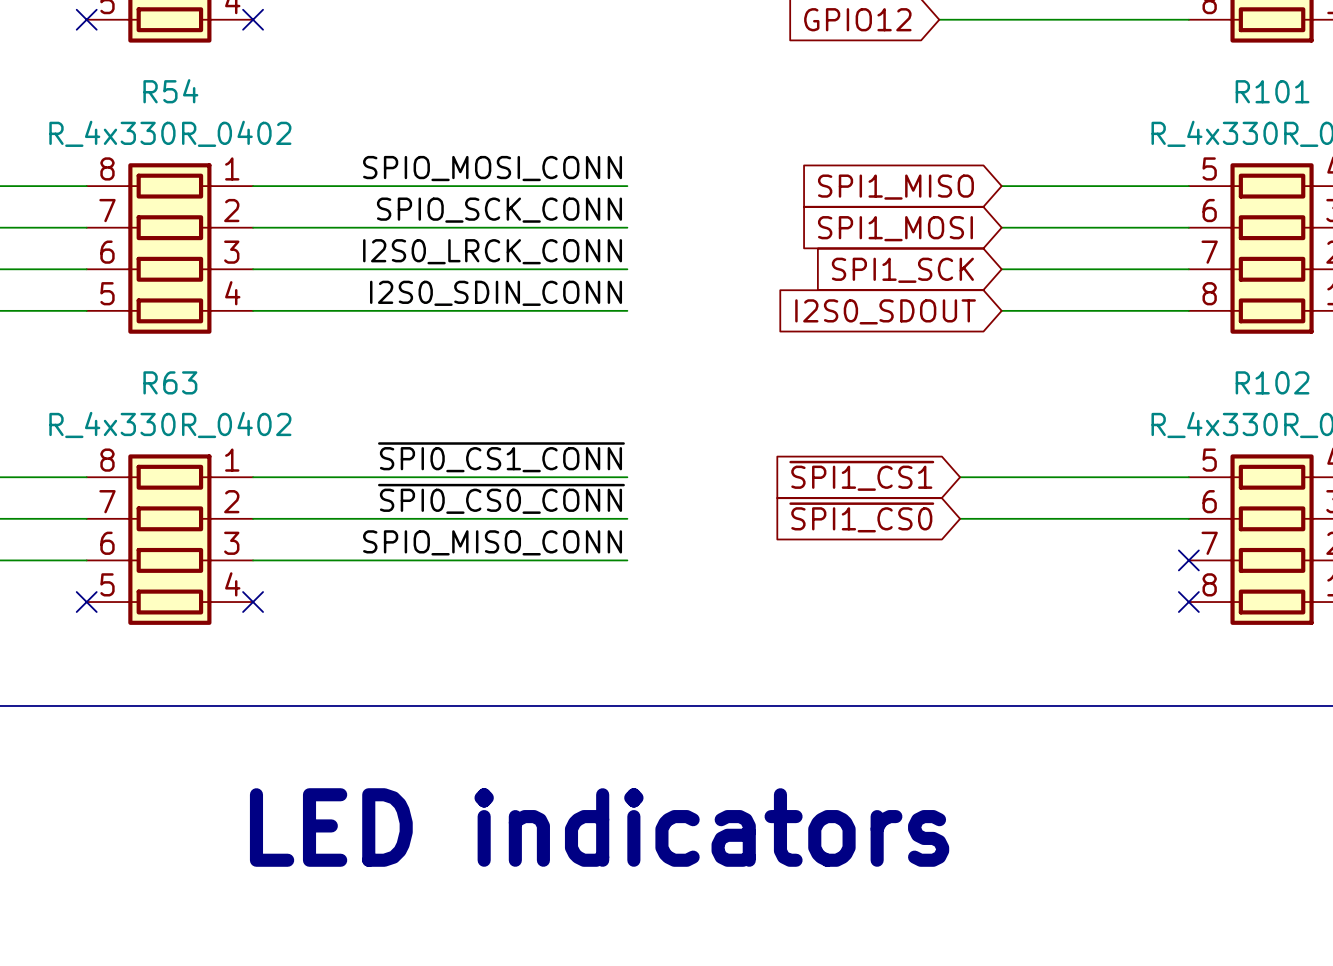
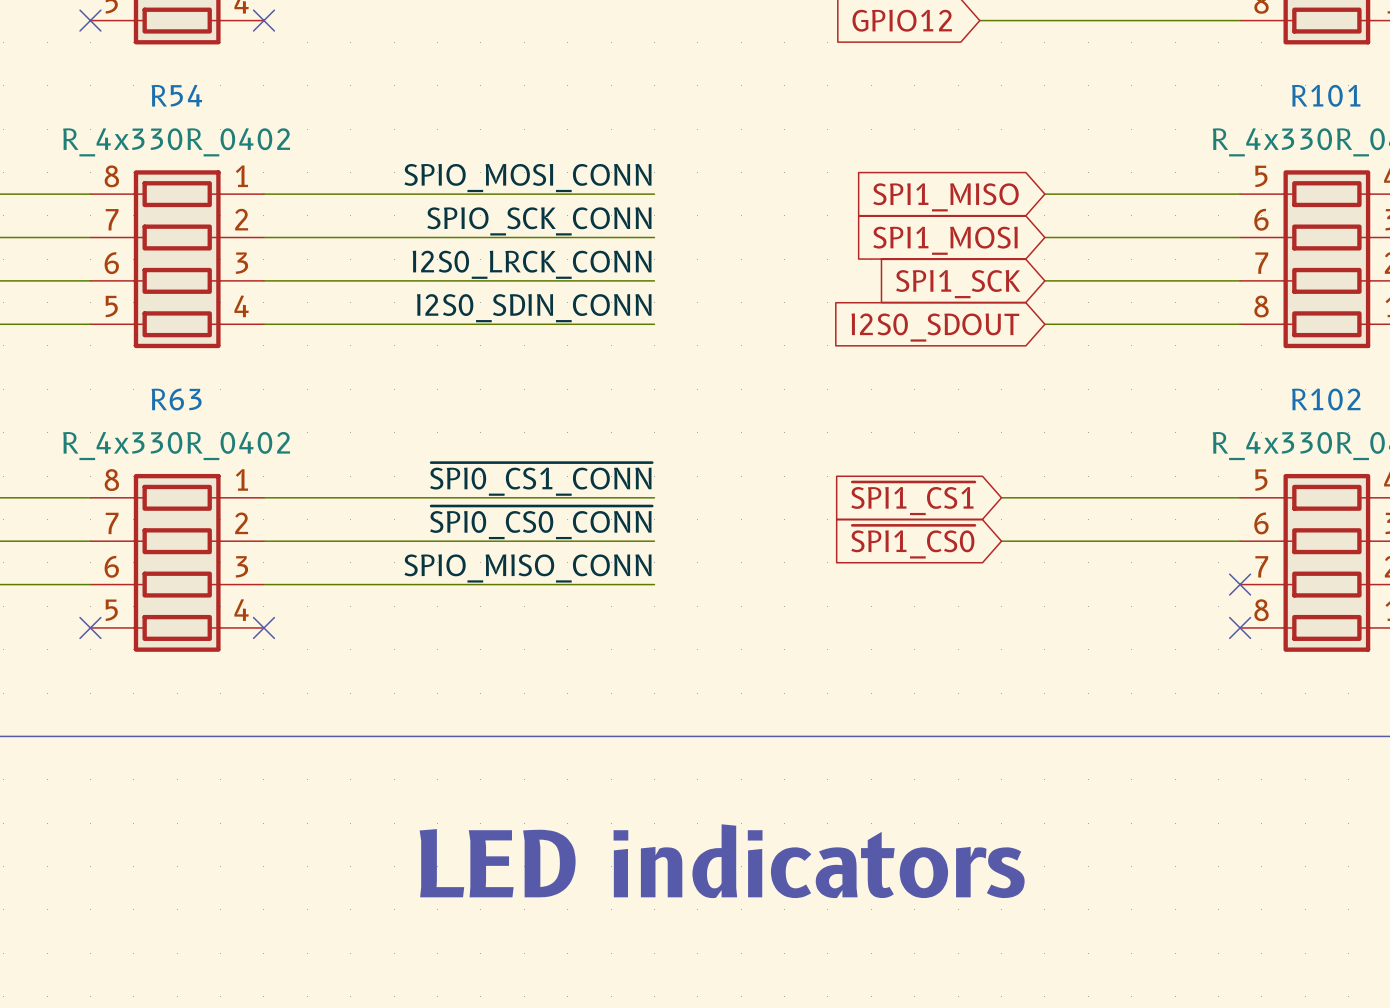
text position: LED indicators (599, 827) -> LED indicators (722, 861)

